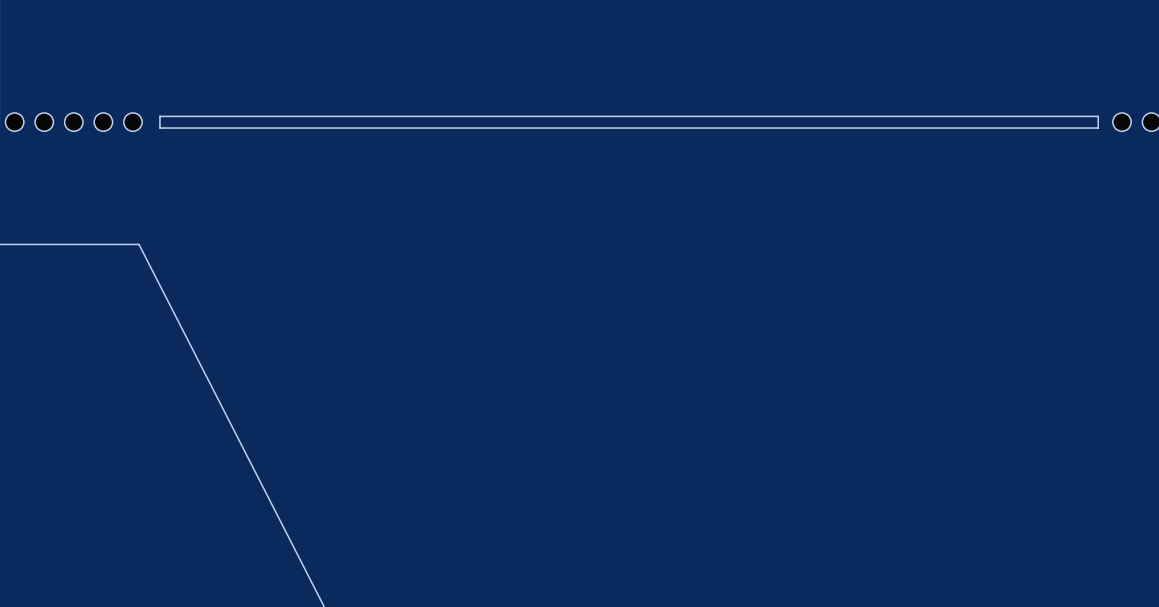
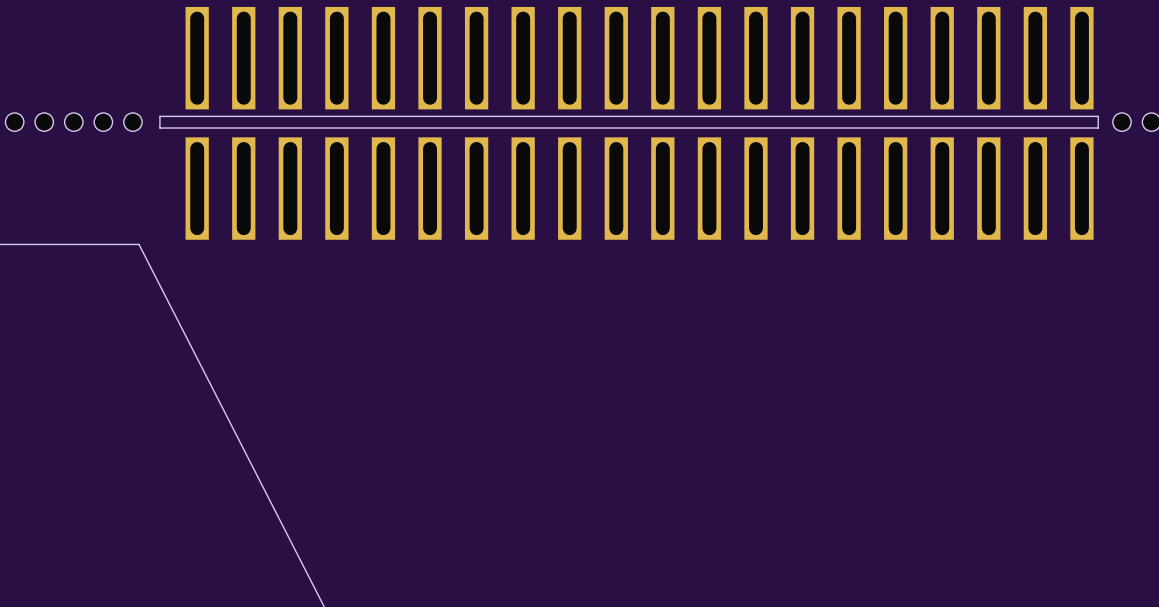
part: none -> (639, 58)
part: none -> (639, 188)

